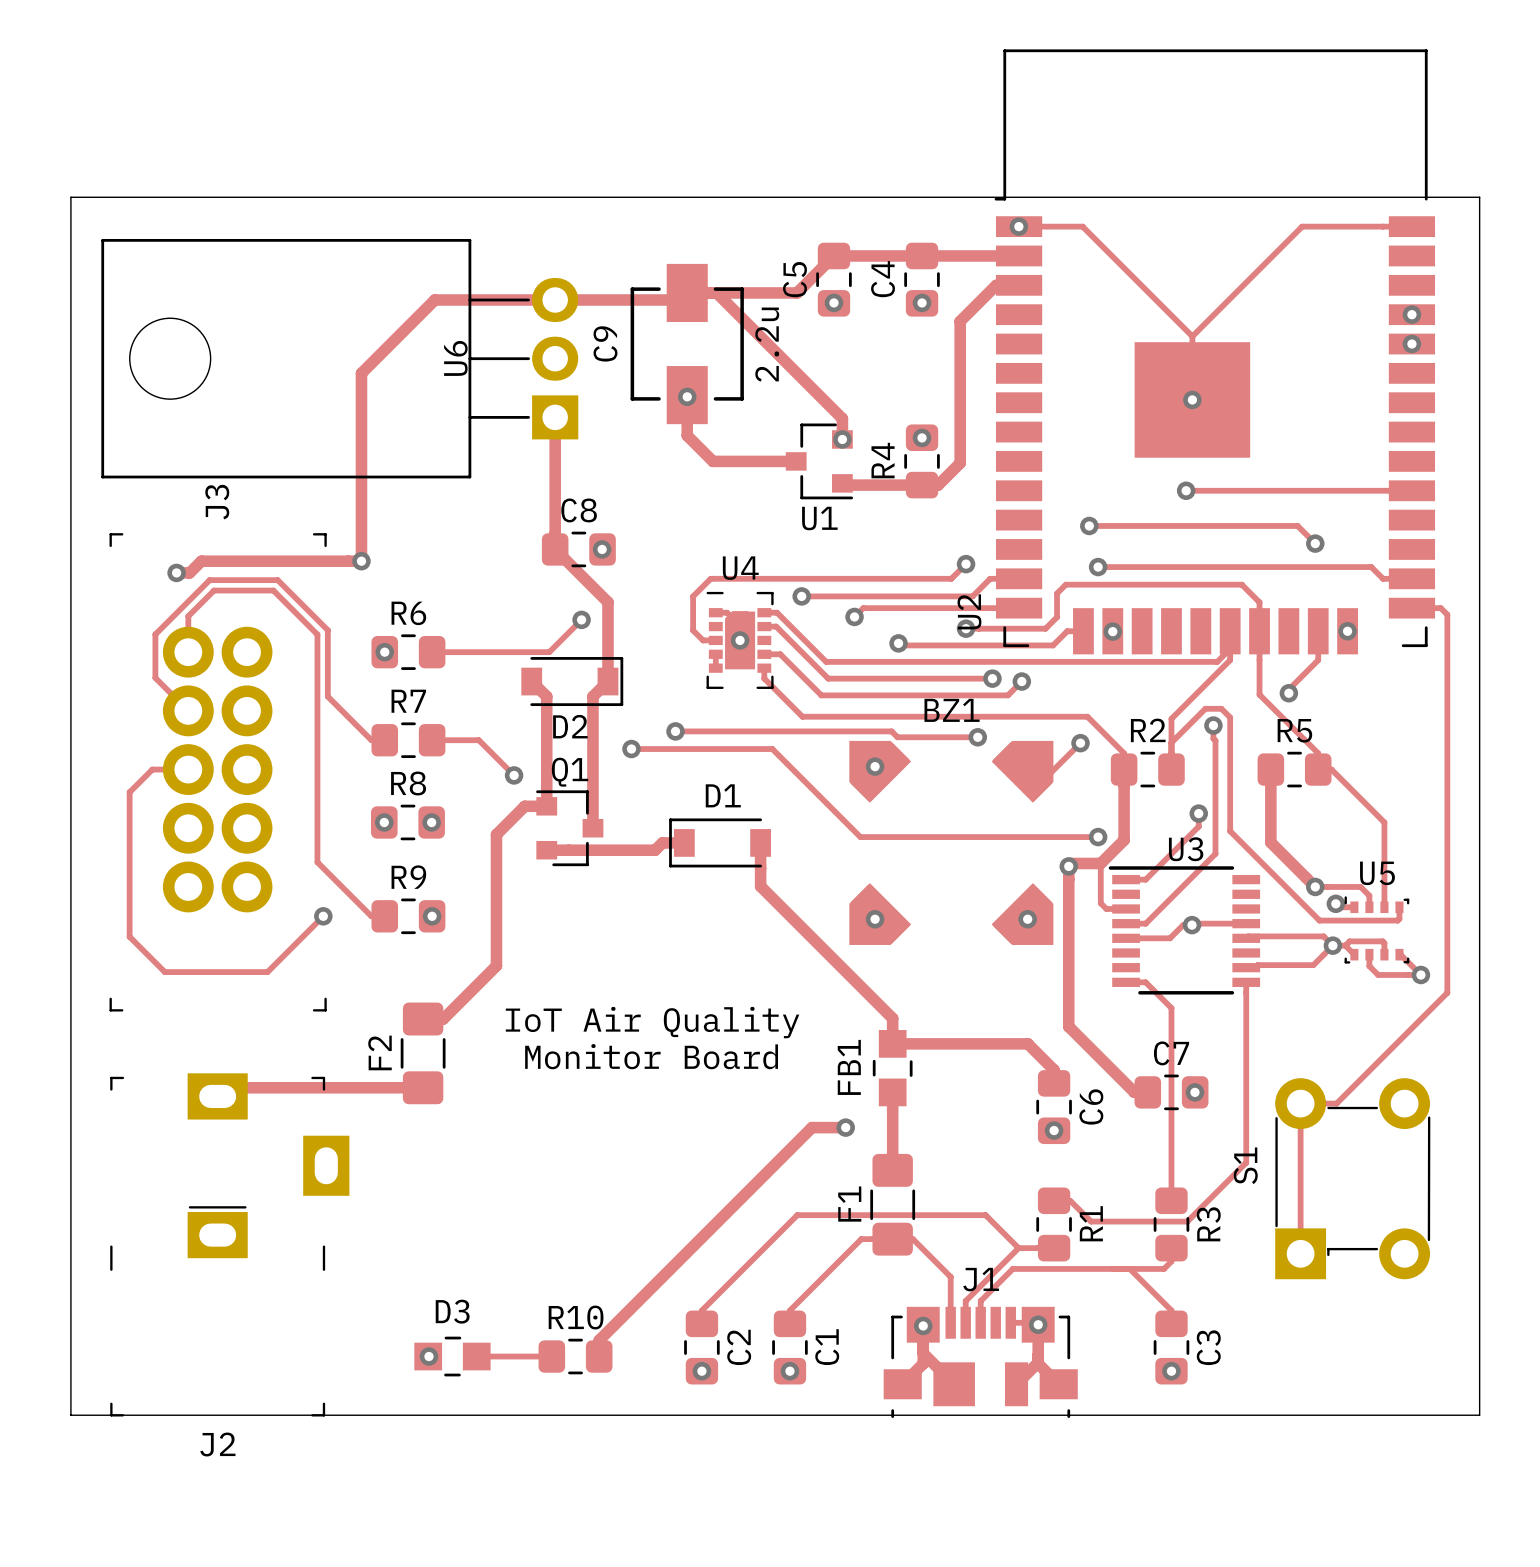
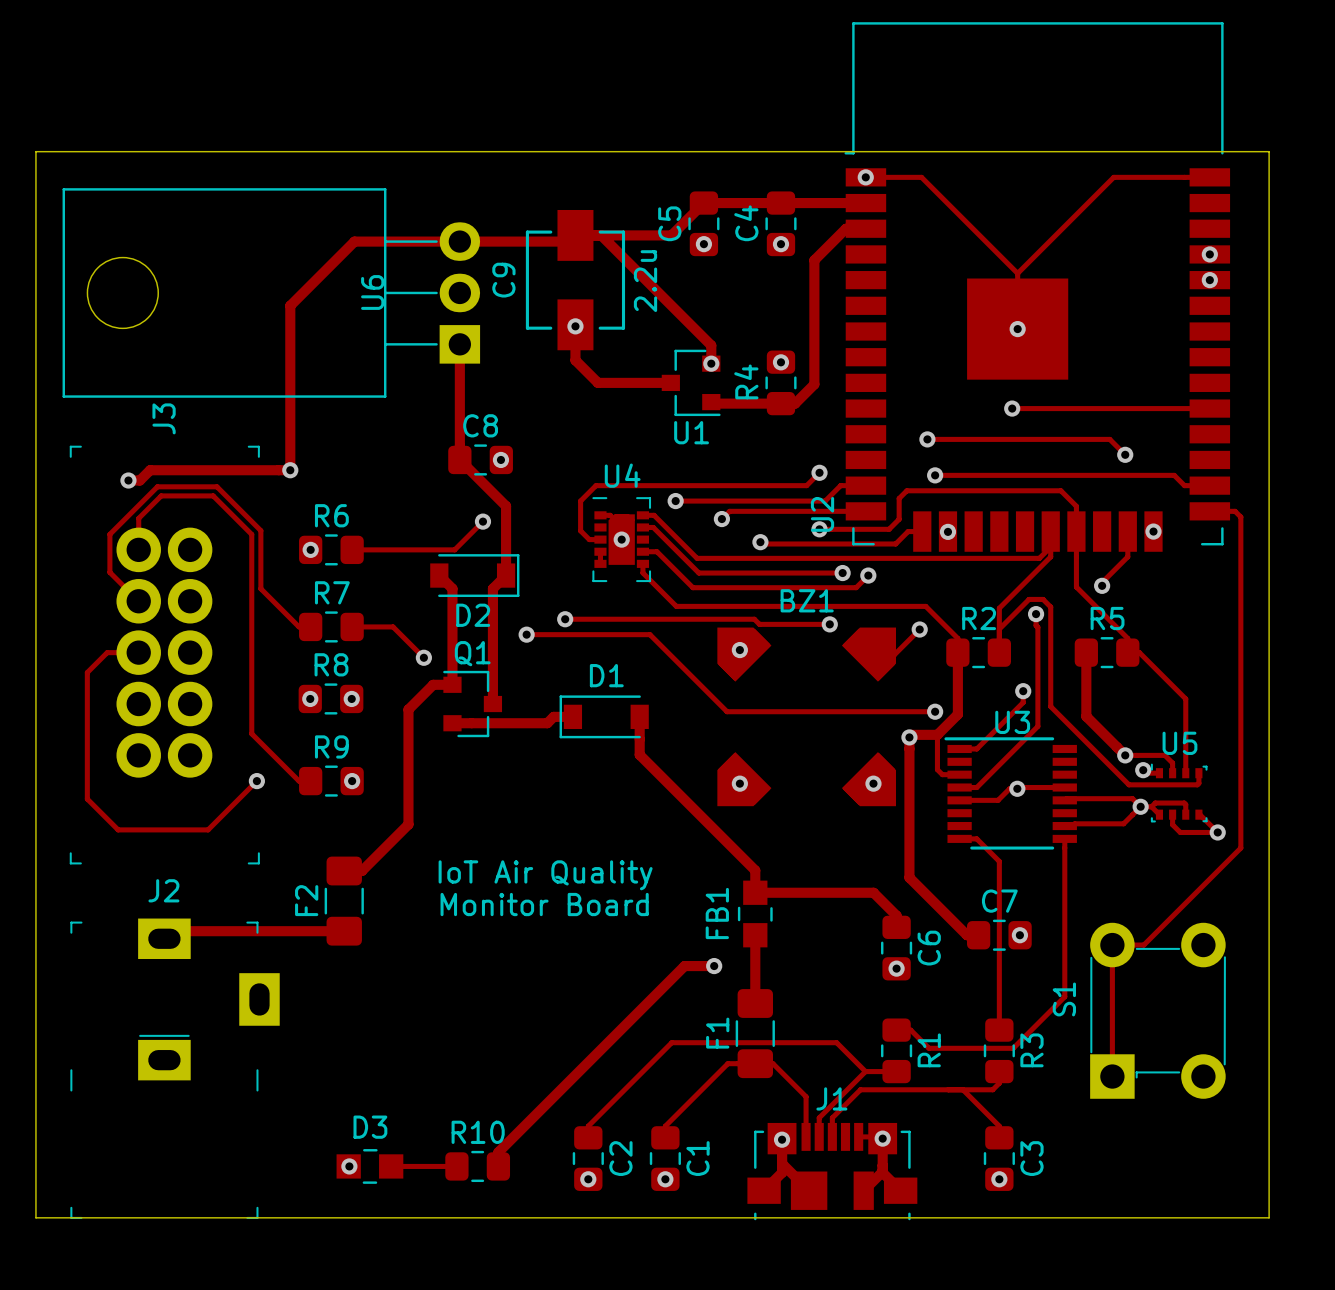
J2 name position: J2 (217, 1444) -> J2 (163, 890)

